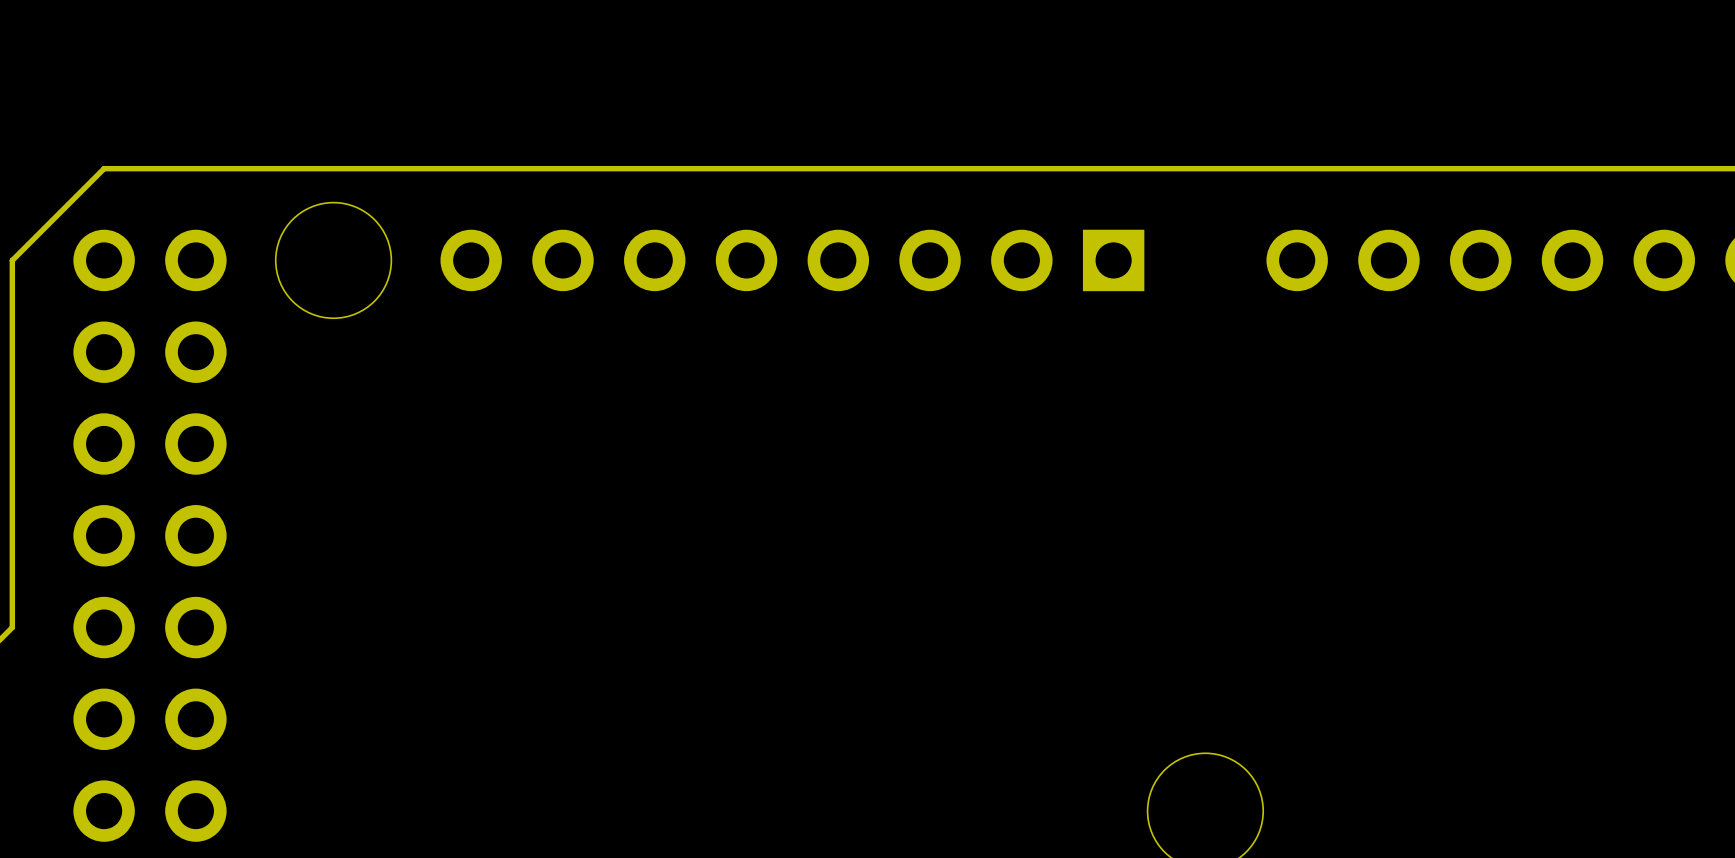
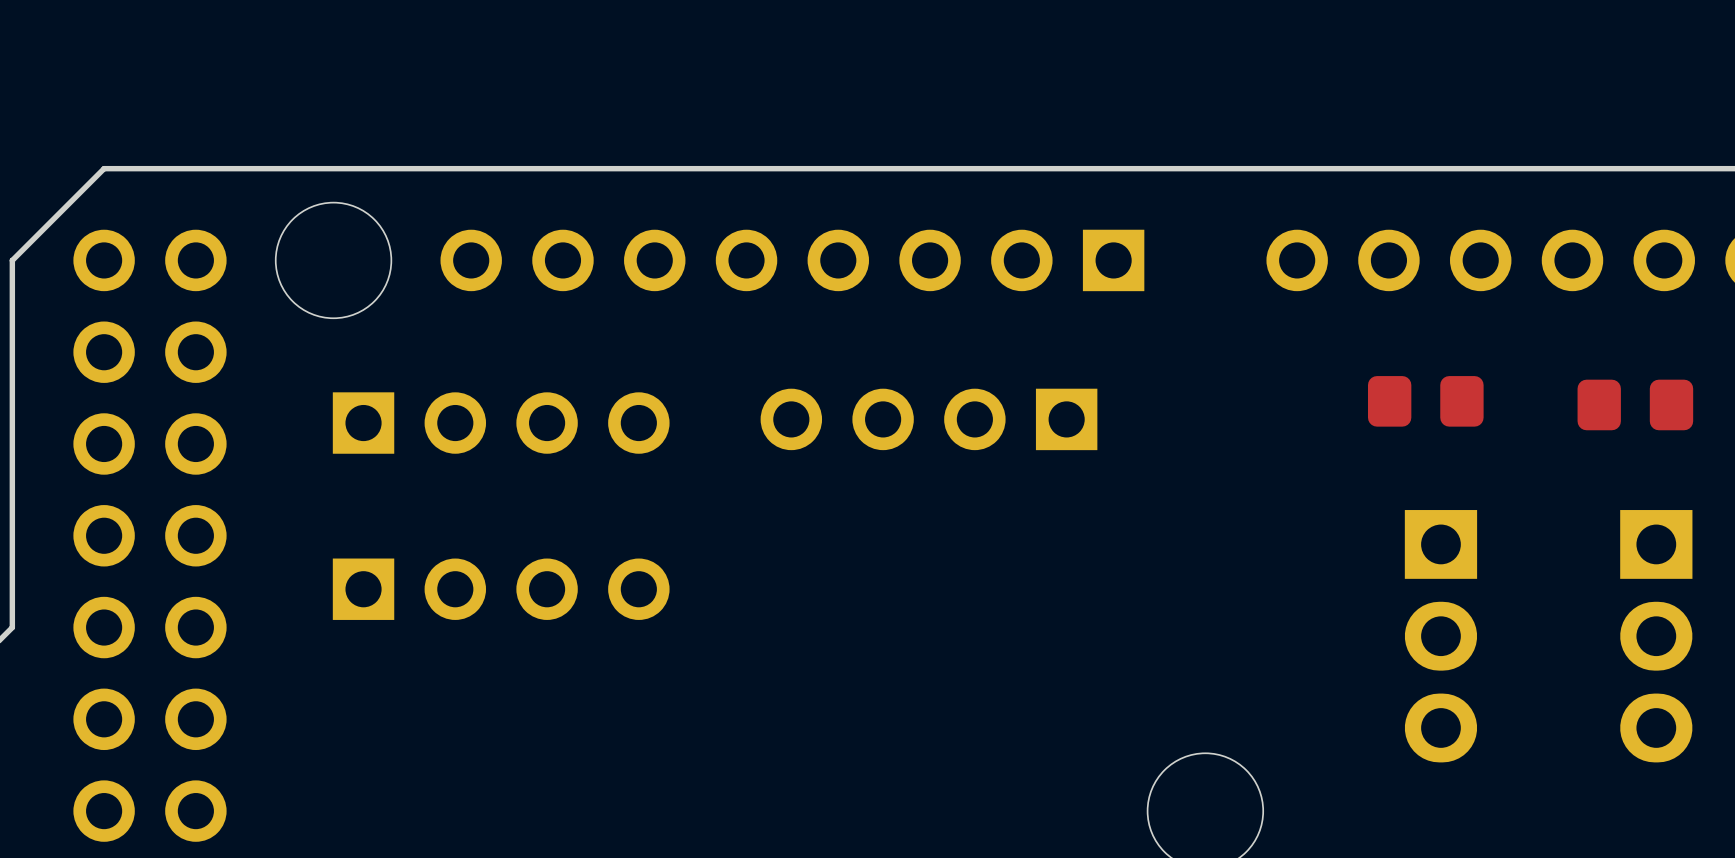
part: none -> (1425, 401)
part: none -> (1635, 404)
part: none -> (928, 419)
part: none -> (501, 423)
part: none -> (501, 589)
part: none -> (1440, 636)
part: none -> (1656, 636)

